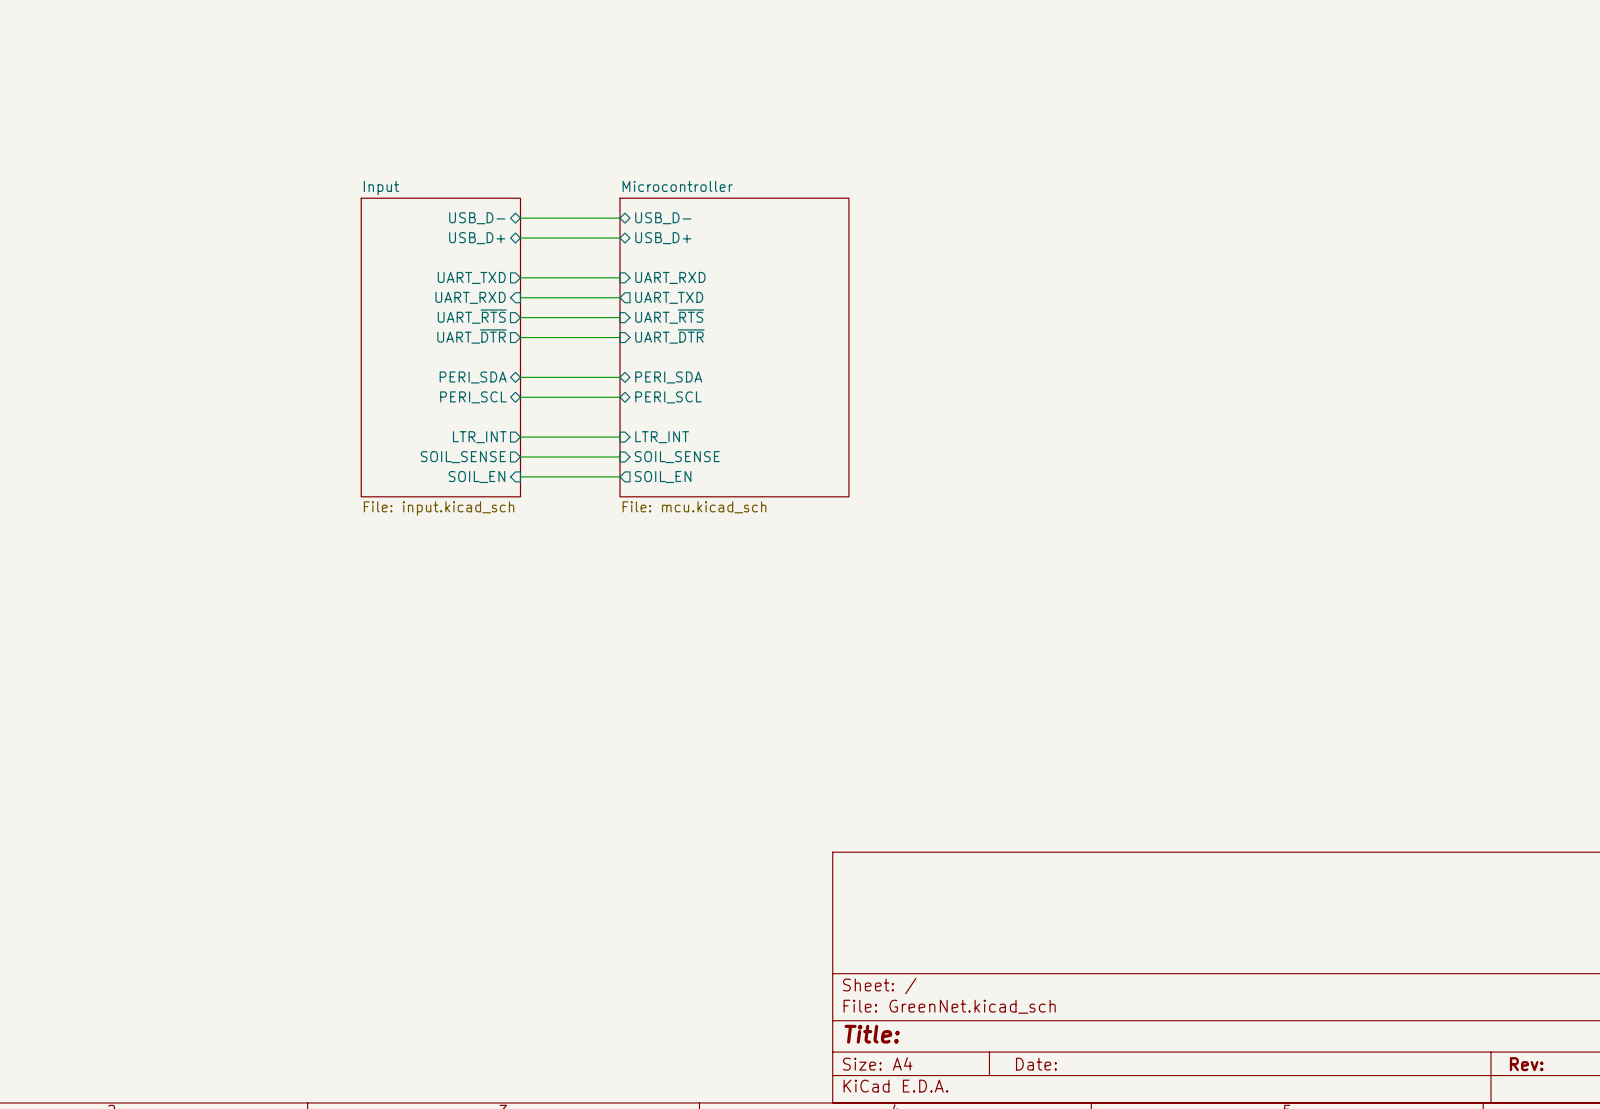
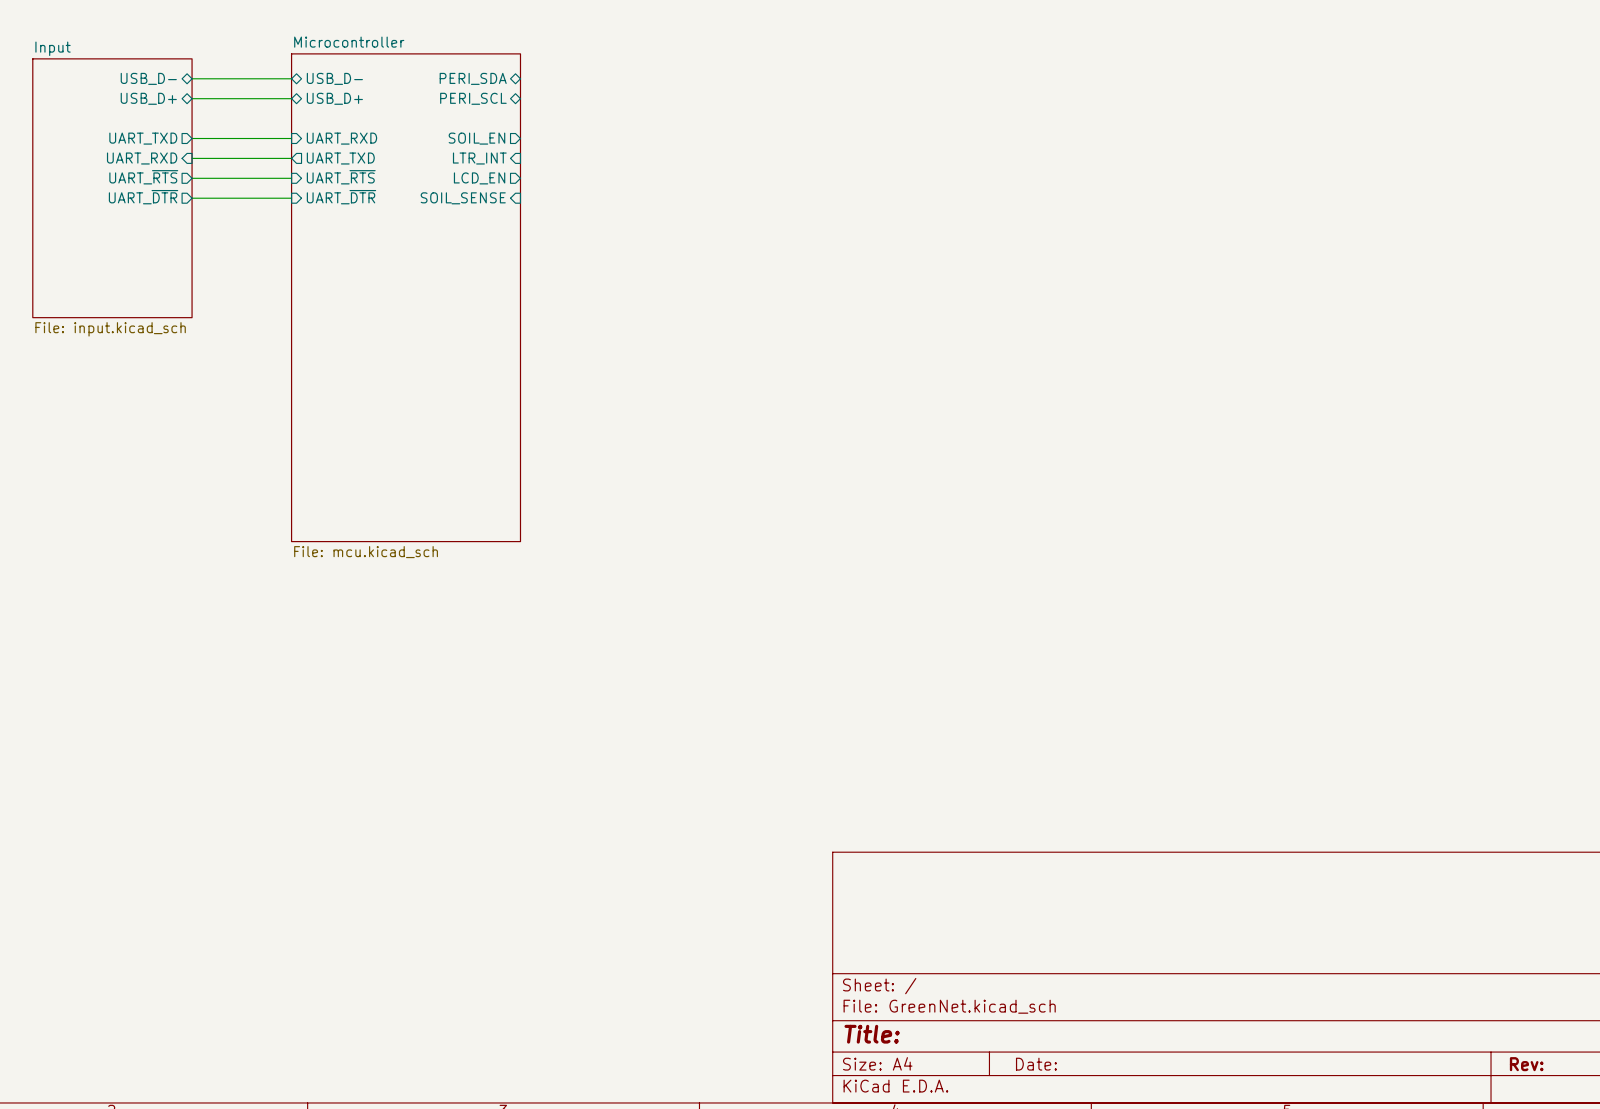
sheet pin: none -> USB_D- (148, 78)
wire: none -> (192, 78) (291, 78)
sheet pin: none -> USB_D- (334, 78)
sheet pin: none -> PERI_SDA (473, 78)
sheet pin: none -> USB_D+ (148, 98)
wire: none -> (192, 98) (291, 98)
sheet pin: none -> USB_D+ (334, 98)
sheet pin: none -> PERI_SCL (473, 98)
sheet pin: none -> UART_TXD (143, 138)
wire: none -> (192, 138) (291, 138)
sheet pin: none -> UART_RXD (341, 138)
sheet pin: none -> SOIL_EN (476, 138)
sheet pin: none -> UART_RXD (142, 158)
wire: none -> (192, 158) (291, 158)
sheet pin: none -> UART_TXD (340, 158)
sheet pin: none -> LTR_INT (479, 158)
sheet pin: none -> UART_~{RTS} (143, 177)
sheet pin: none -> UART_~{RTS} (341, 177)
wire: none -> (192, 178) (291, 178)
sheet pin: none -> LCD_EN (479, 178)
sheet Input: none -> File: input.kicad_sch (112, 188)
sheet pin: none -> UART_~{DTR} (143, 197)
sheet pin: none -> UART_~{DTR} (341, 197)
wire: none -> (192, 198) (291, 198)
sheet pin: none -> SOIL_SENSE (463, 198)
sheet pin: USB_D- (477, 218) -> none
wire: (520, 218) (620, 218) -> none
sheet pin: USB_D- (663, 218) -> none
sheet pin: USB_D+ (477, 238) -> none
wire: (520, 238) (620, 238) -> none
sheet pin: USB_D+ (663, 238) -> none
sheet pin: UART_TXD (471, 277) -> none
wire: (520, 277) (620, 277) -> none
sheet pin: UART_RXD (670, 277) -> none
sheet Microcontroller: none -> File: mcu.kicad_sch (406, 297)
sheet pin: UART_RXD (470, 297) -> none
wire: (520, 297) (620, 297) -> none
sheet pin: UART_TXD (669, 297) -> none
sheet pin: UART_~{RTS} (472, 316) -> none
sheet pin: UART_~{RTS} (669, 316) -> none
wire: (520, 317) (620, 317) -> none
sheet pin: UART_~{DTR} (471, 336) -> none
sheet pin: UART_~{DTR} (669, 336) -> none
wire: (520, 337) (620, 337) -> none
sheet Input: File: input.kicad_sch (440, 347) -> none
sheet Microcontroller: File: mcu.kicad_sch (734, 347) -> none
sheet pin: PERI_SDA (473, 377) -> none
wire: (520, 377) (620, 377) -> none
sheet pin: PERI_SDA (668, 377) -> none
sheet pin: PERI_SCL (473, 397) -> none
wire: (520, 397) (620, 397) -> none
sheet pin: PERI_SCL (668, 397) -> none
sheet pin: LTR_INT (479, 437) -> none
wire: (520, 437) (620, 437) -> none
sheet pin: LTR_INT (662, 437) -> none
wire: (520, 456) (620, 456) -> none
sheet pin: SOIL_SENSE (463, 457) -> none
sheet pin: SOIL_SENSE (677, 457) -> none
wire: (520, 476) (620, 476) -> none
sheet pin: SOIL_EN (476, 477) -> none
sheet pin: SOIL_EN (663, 477) -> none

